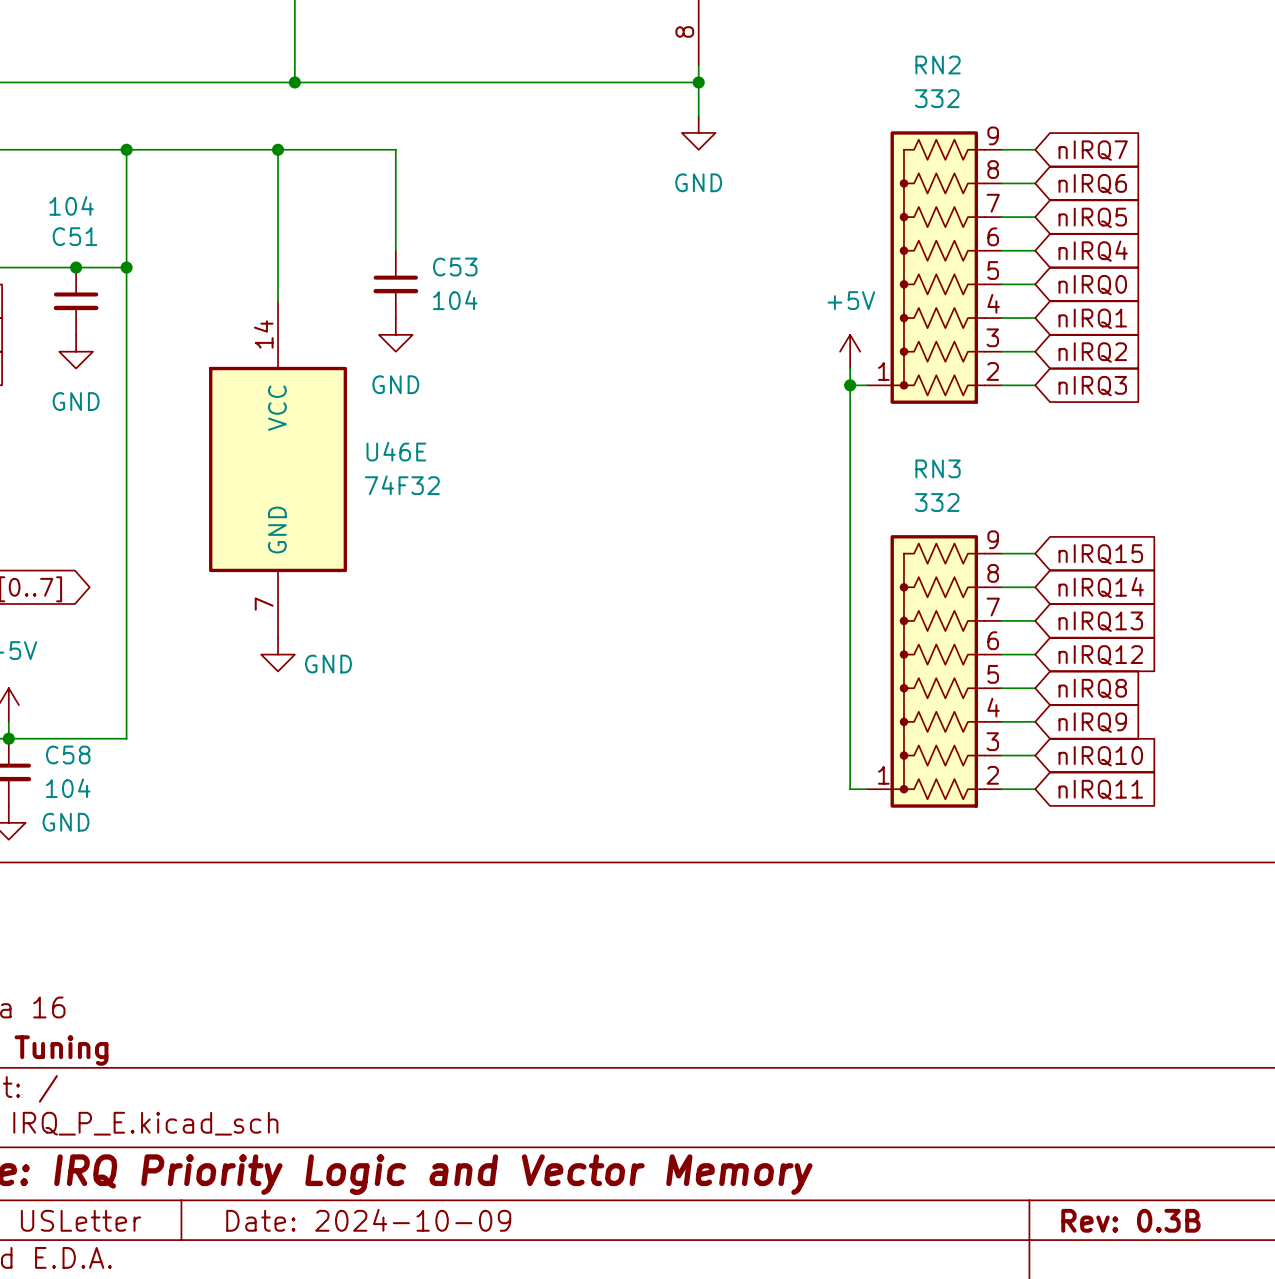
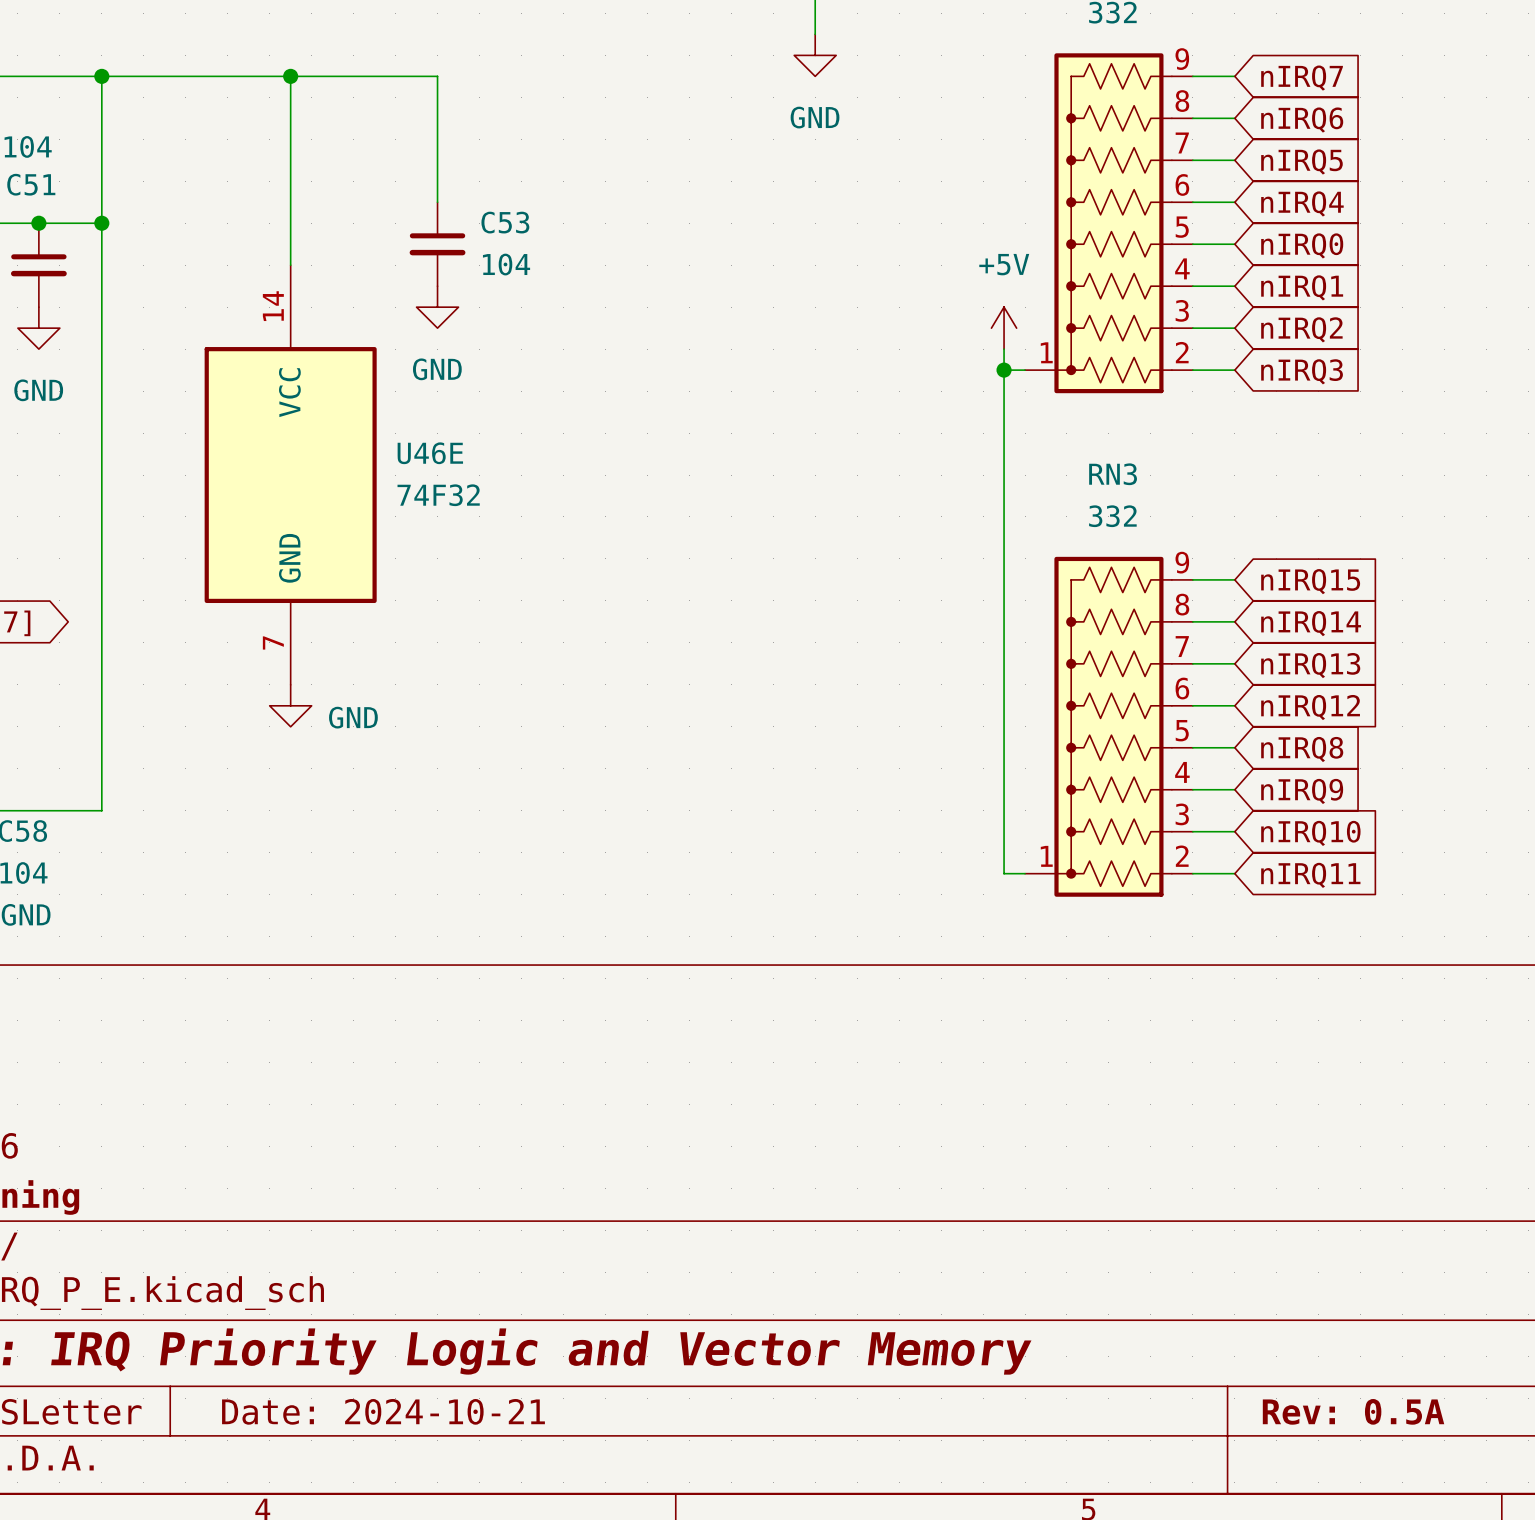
title block: Date: 2024-10-09 (368, 1220) -> Date: 2024-10-21 (383, 1411)
title block: Rev: 0.3B (1130, 1220) -> Rev: 0.5A (1353, 1411)

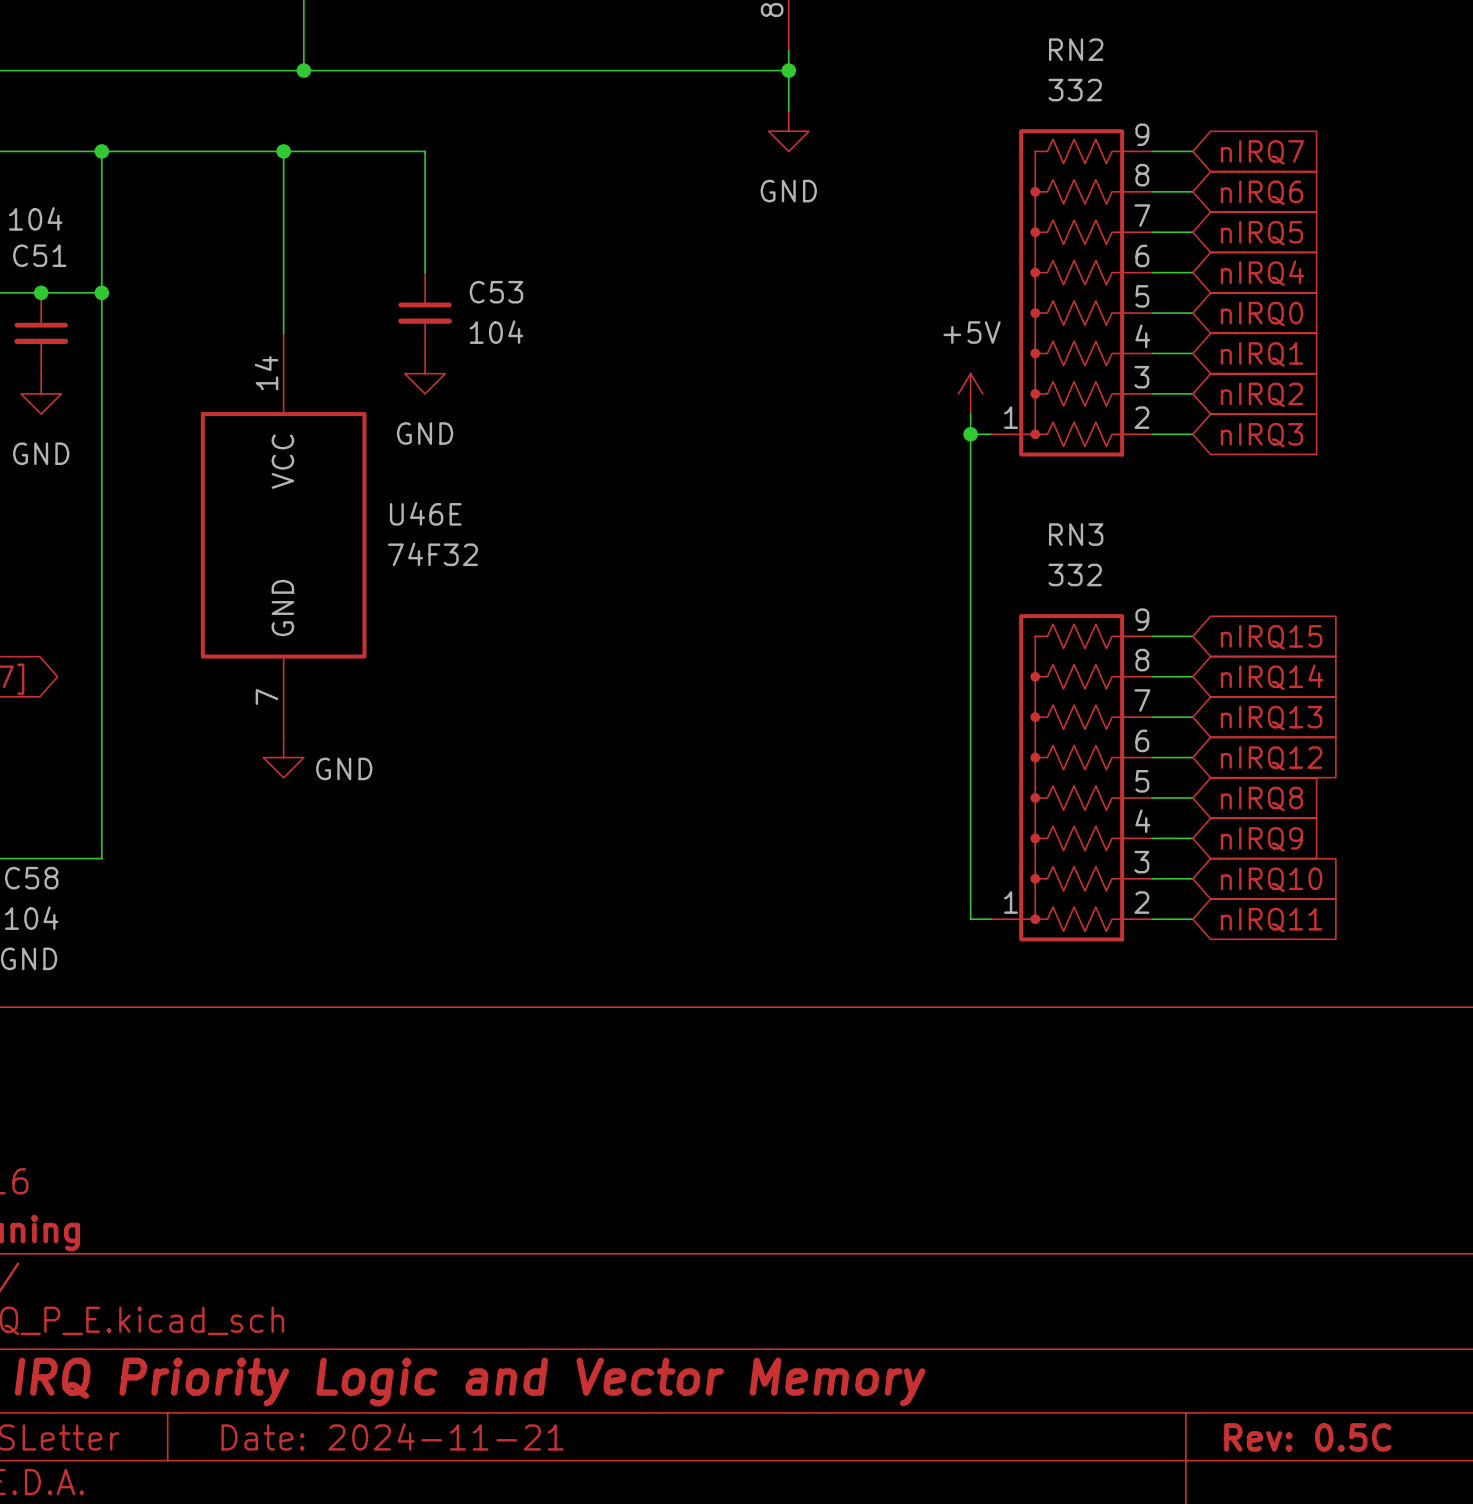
title block: Date: 2024-10-21 (383, 1411) -> Date: 2024-11-21 (392, 1436)
title block: Rev: 0.5A (1353, 1411) -> Rev: 0.5C (1307, 1437)

